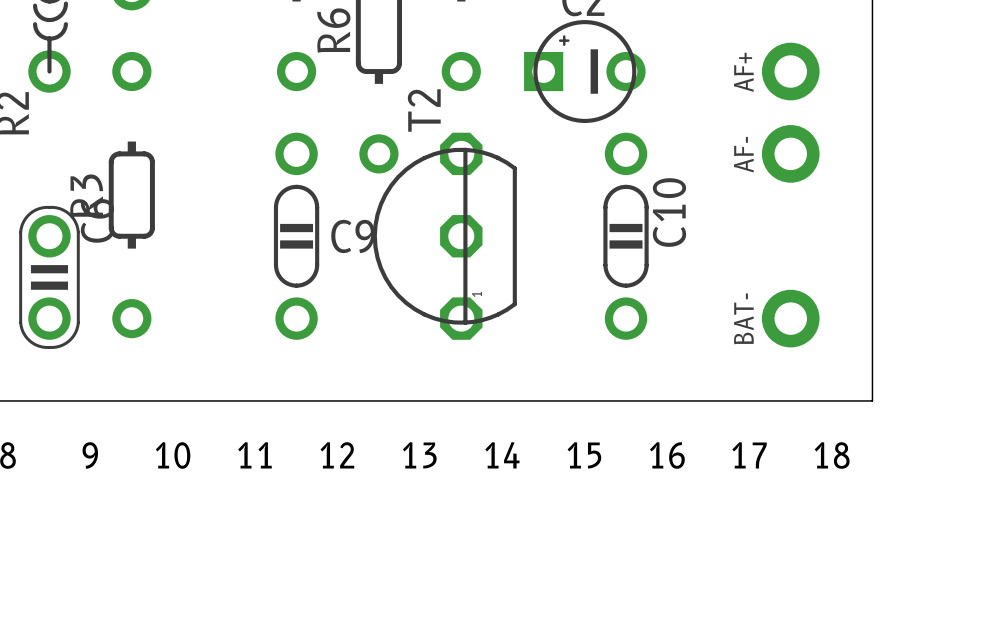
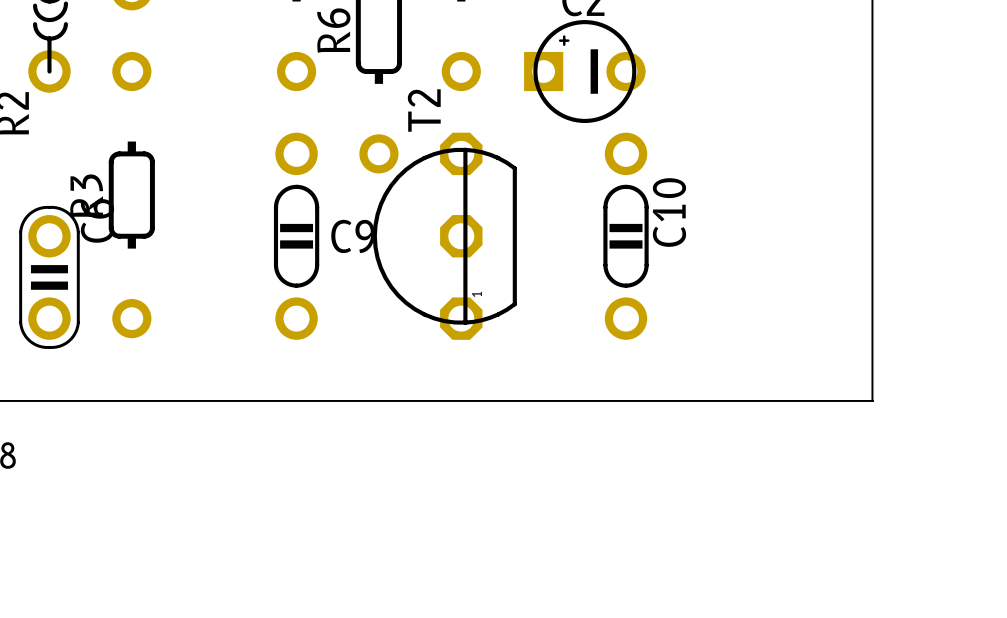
AF+: (790, 71) -> none
AF-: (790, 153) -> none
BAT-: (790, 318) -> none
text: 9 (90, 455) -> none
text: 10 (173, 455) -> none
text: 11 (254, 455) -> none
text: 12 (337, 455) -> none
text: 13 (419, 455) -> none
text: 14 (502, 455) -> none
text: 15 (584, 455) -> none
text: 16 (667, 455) -> none
text: 17 (749, 455) -> none
text: 18 (832, 455) -> none

